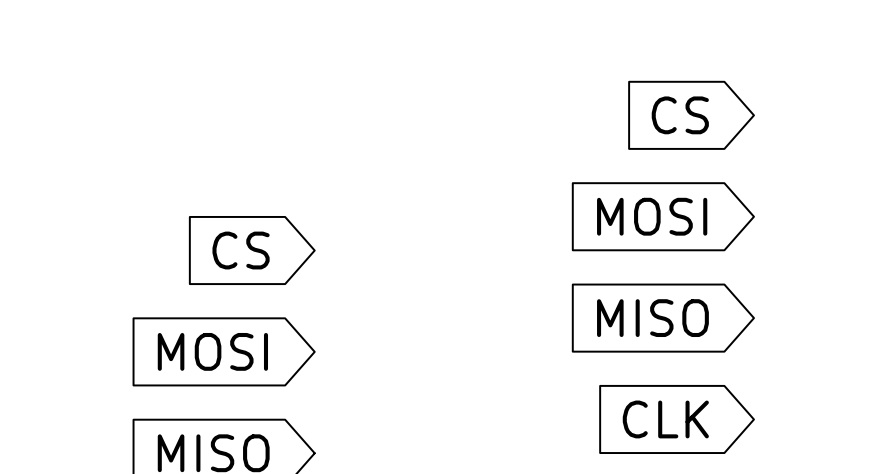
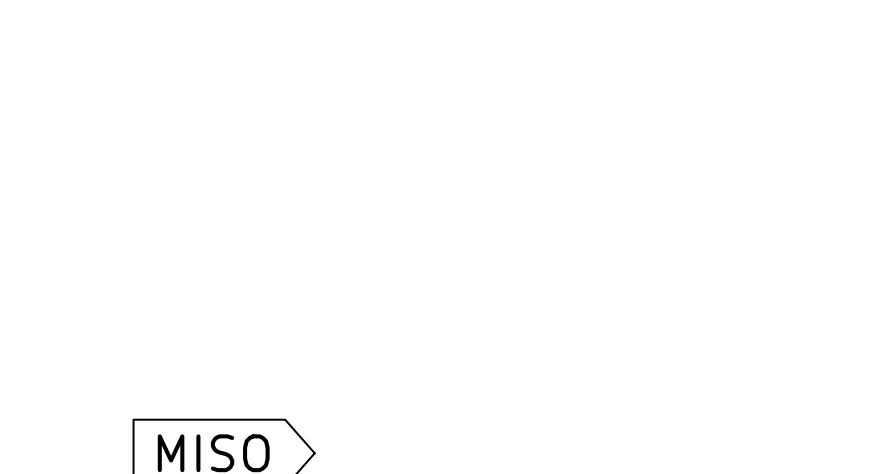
global label: CS (680, 115) -> none
global label: MOSI (652, 216) -> none
global label: CS (241, 250) -> none
global label: MISO (652, 318) -> none
global label: MOSI (212, 351) -> none
global label: CLK (665, 419) -> none

